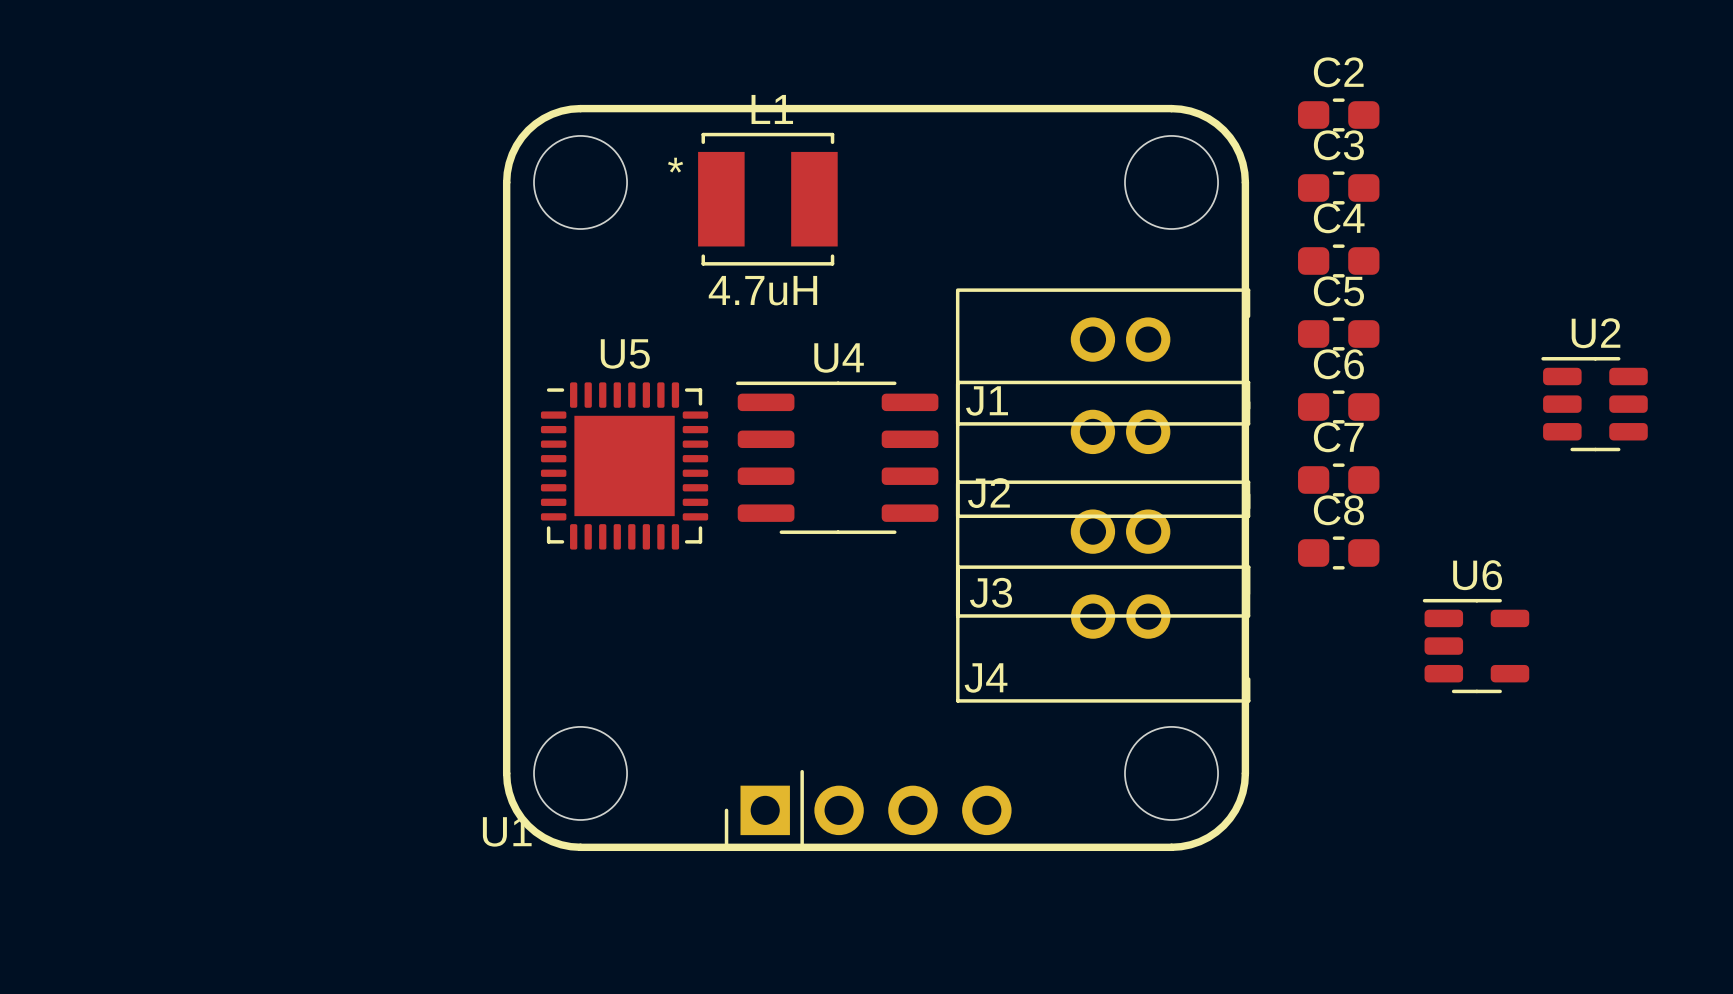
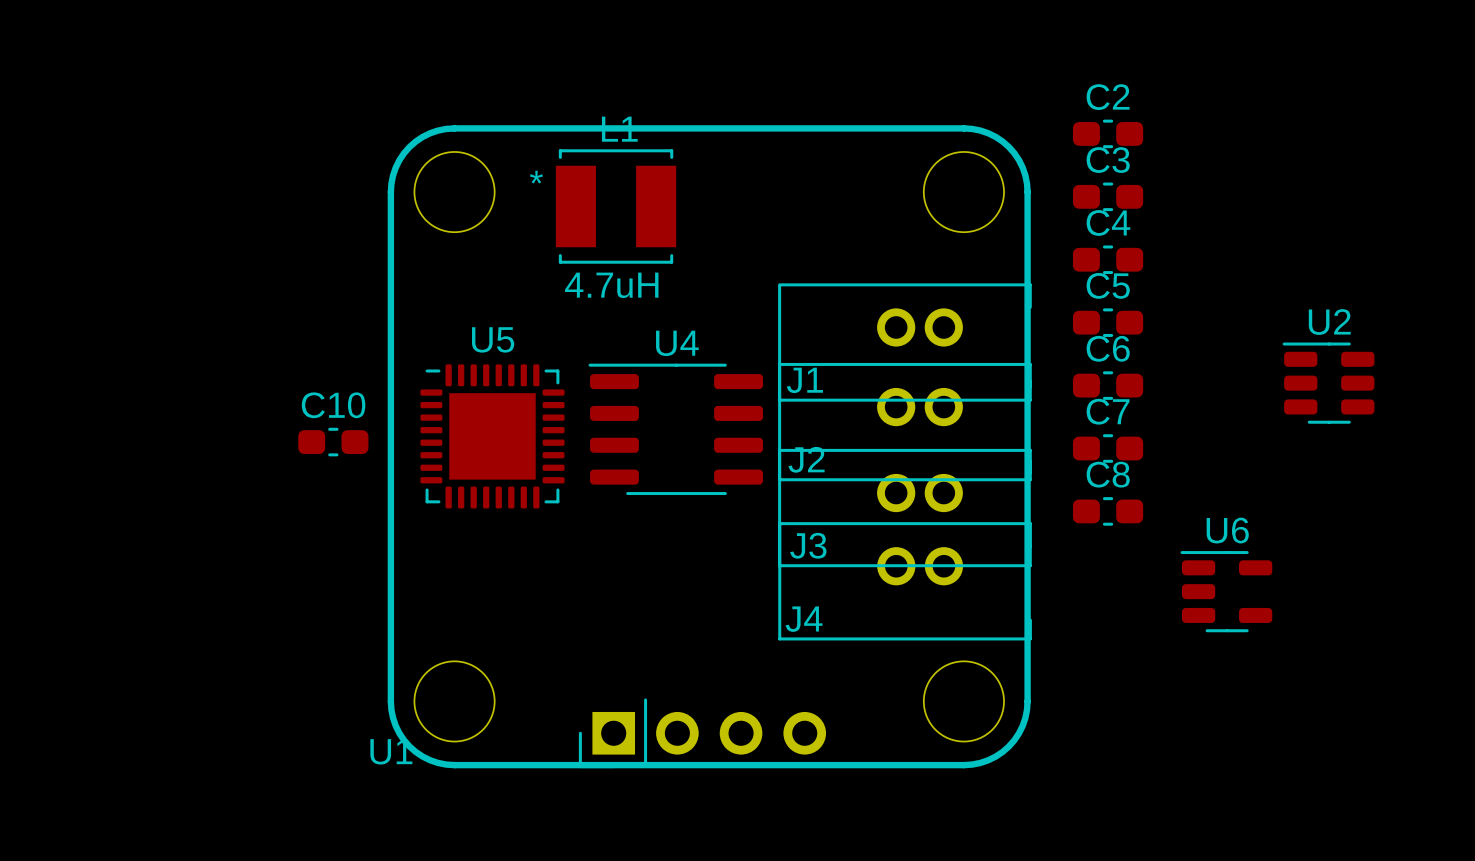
C10: none -> (333, 442)

